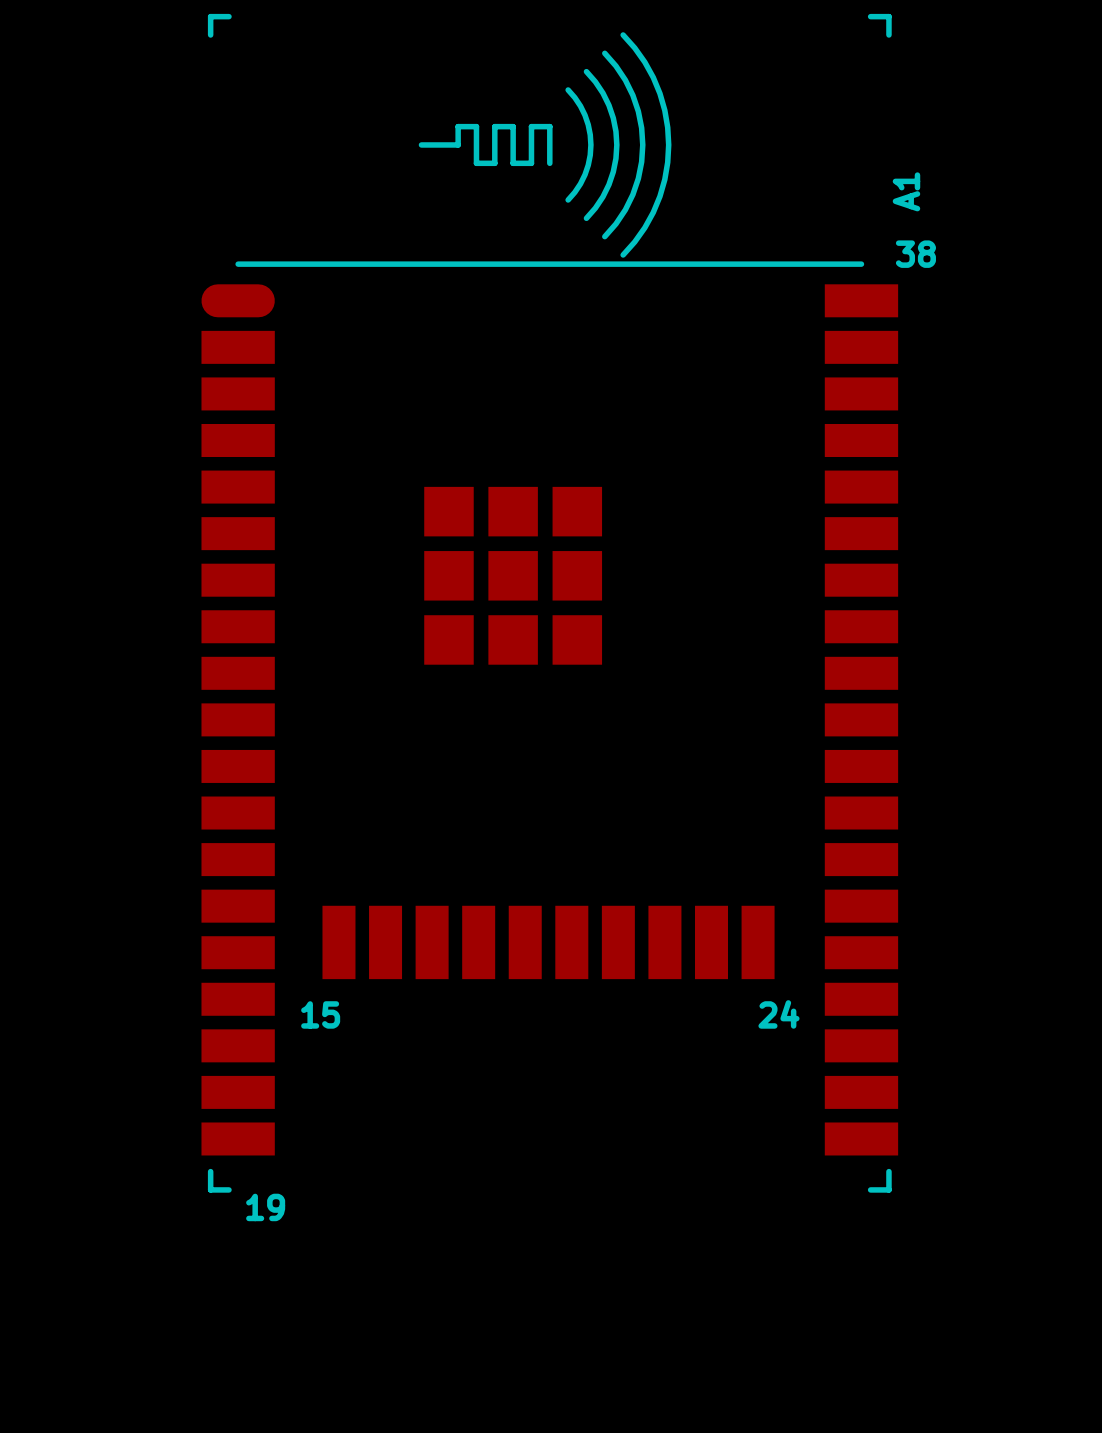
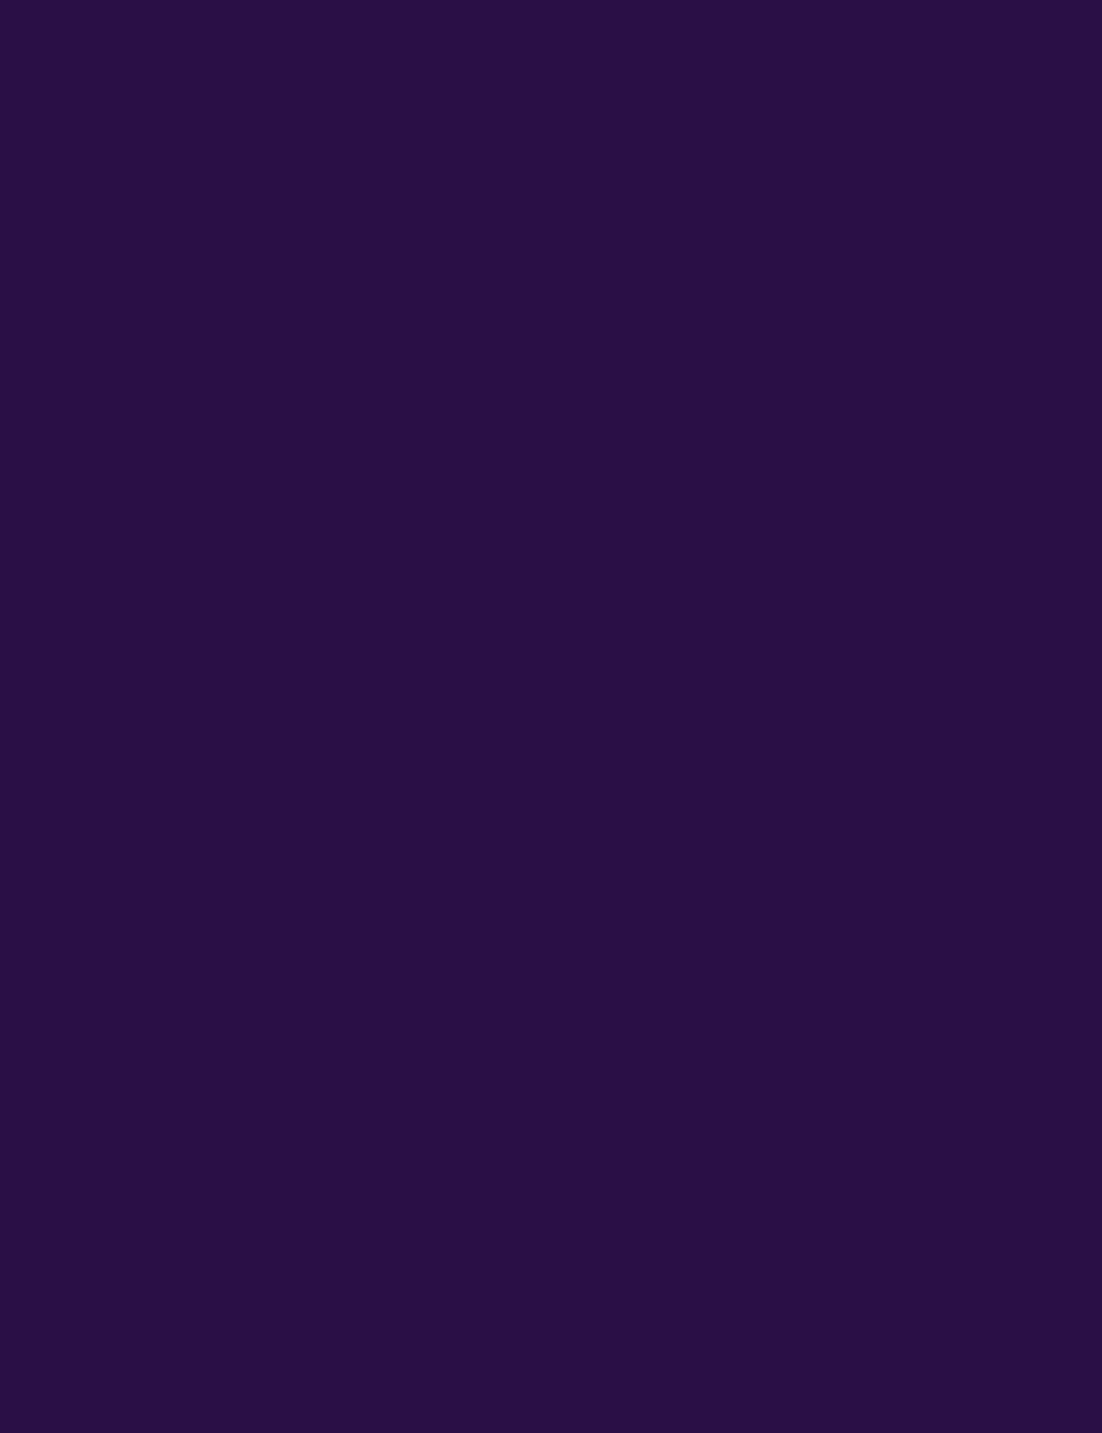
A1: (549, 603) -> none

